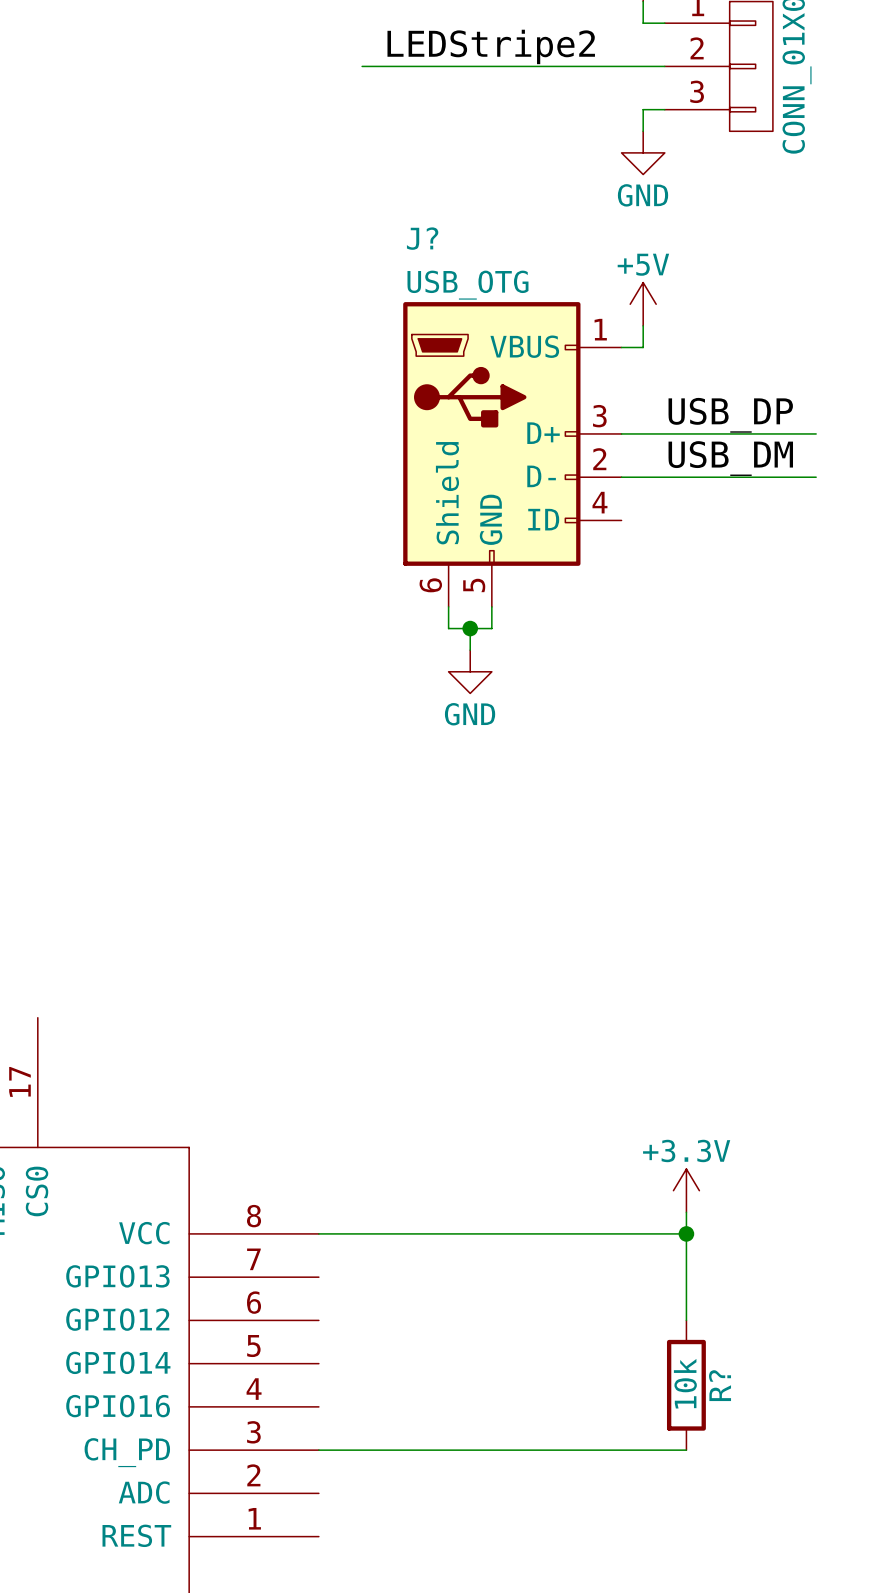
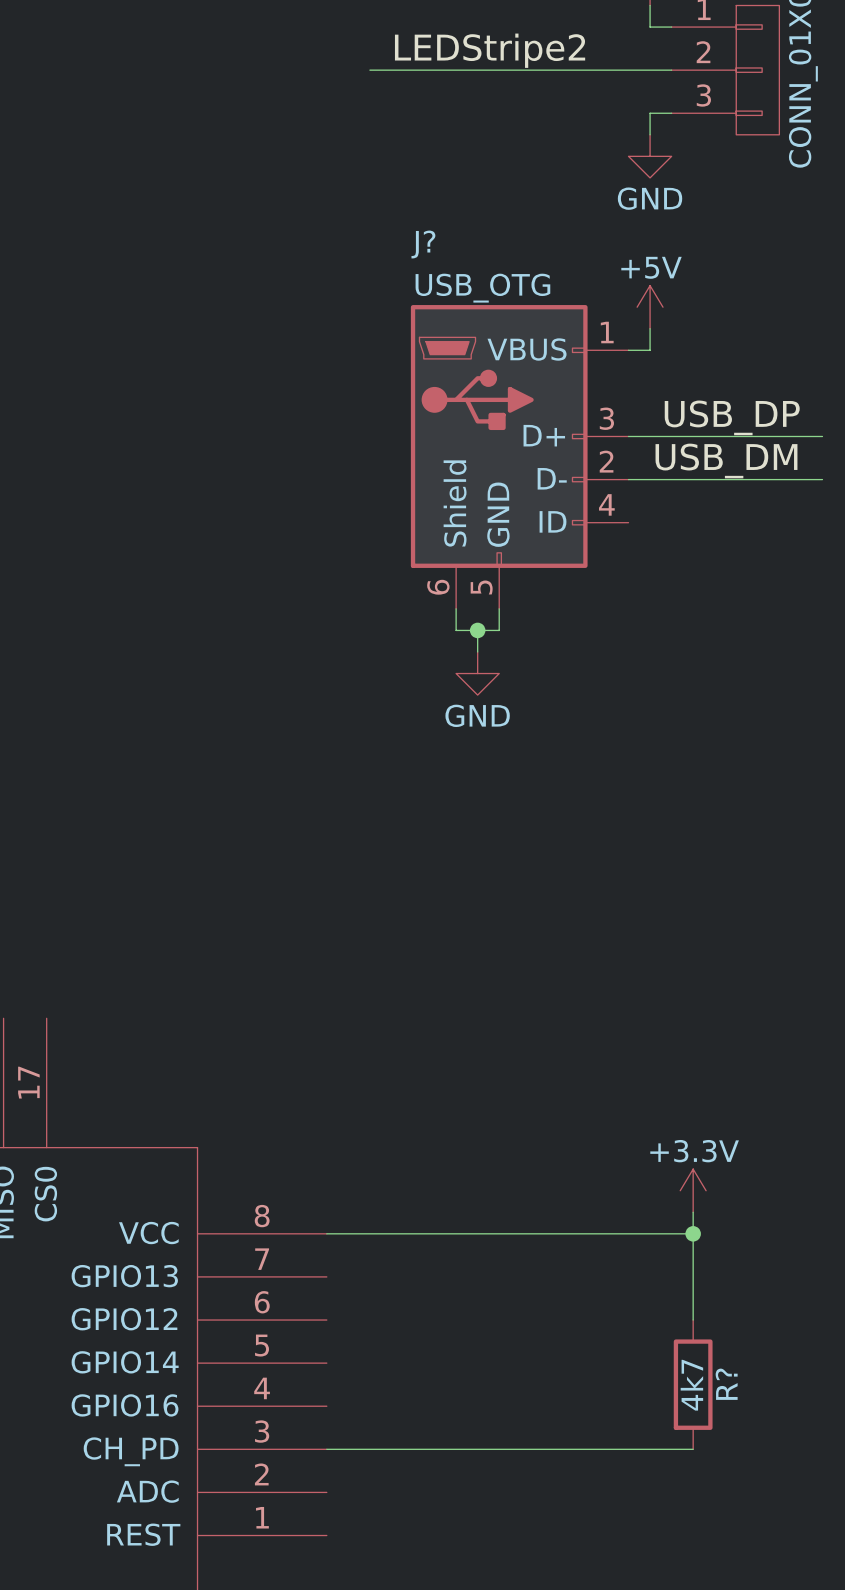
R? value: 10k (685, 1383) -> 4k7 (691, 1385)

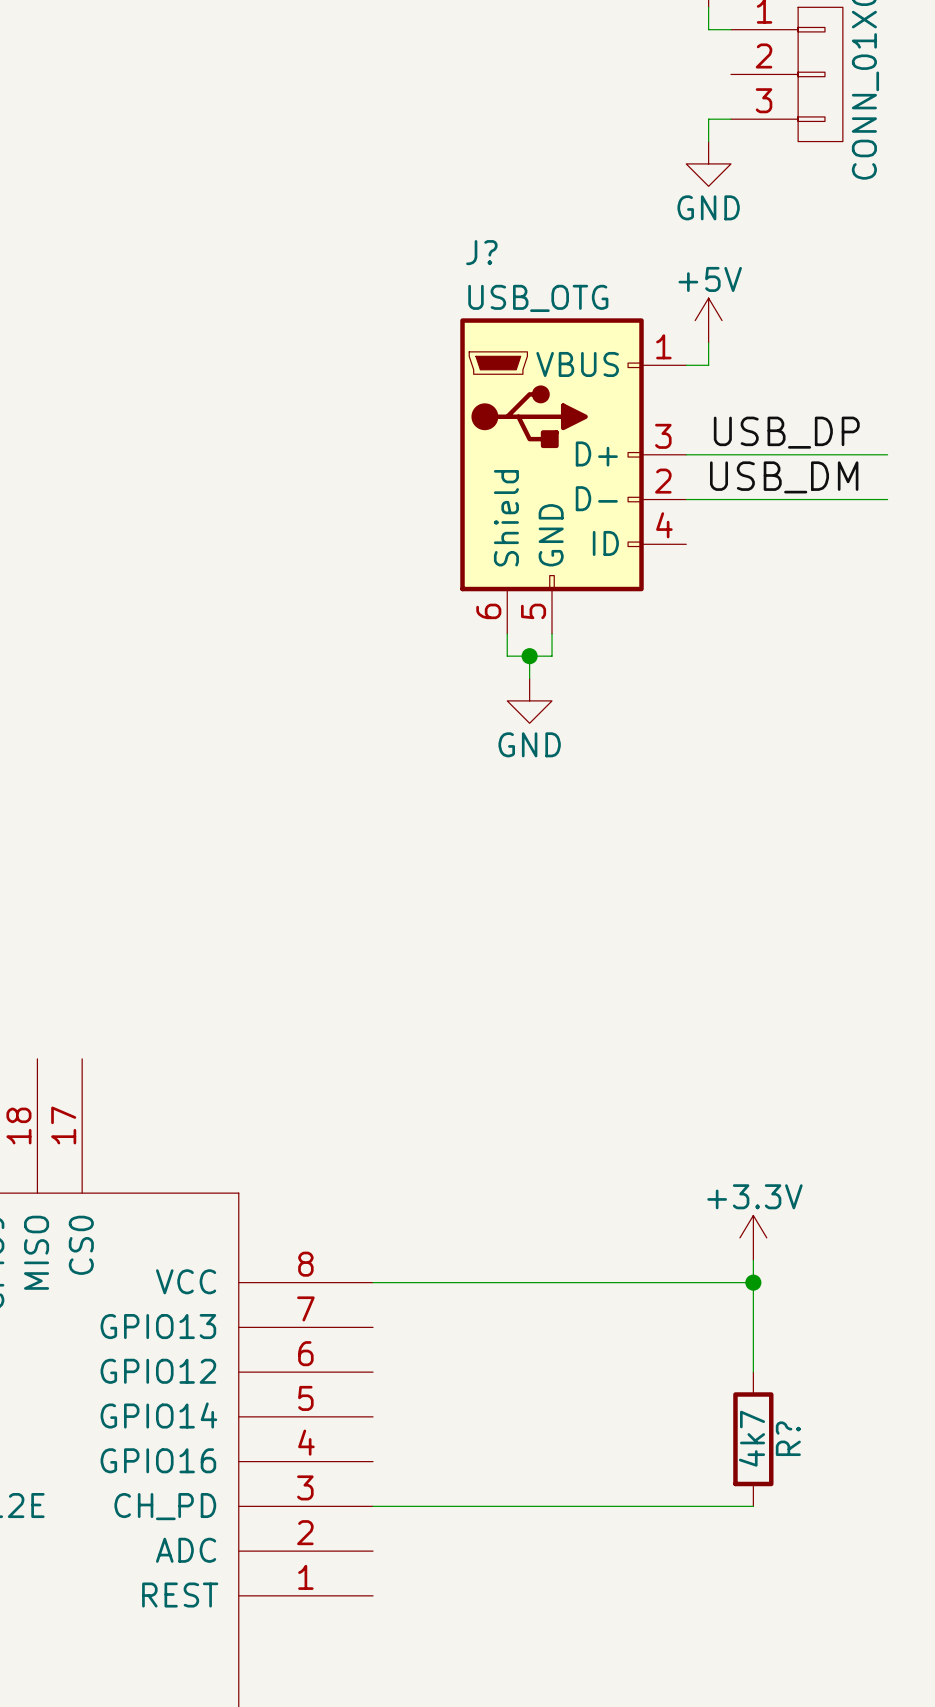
label: LEDStripe2 (490, 50) -> none
wire: (369, 70) (671, 70) -> none

